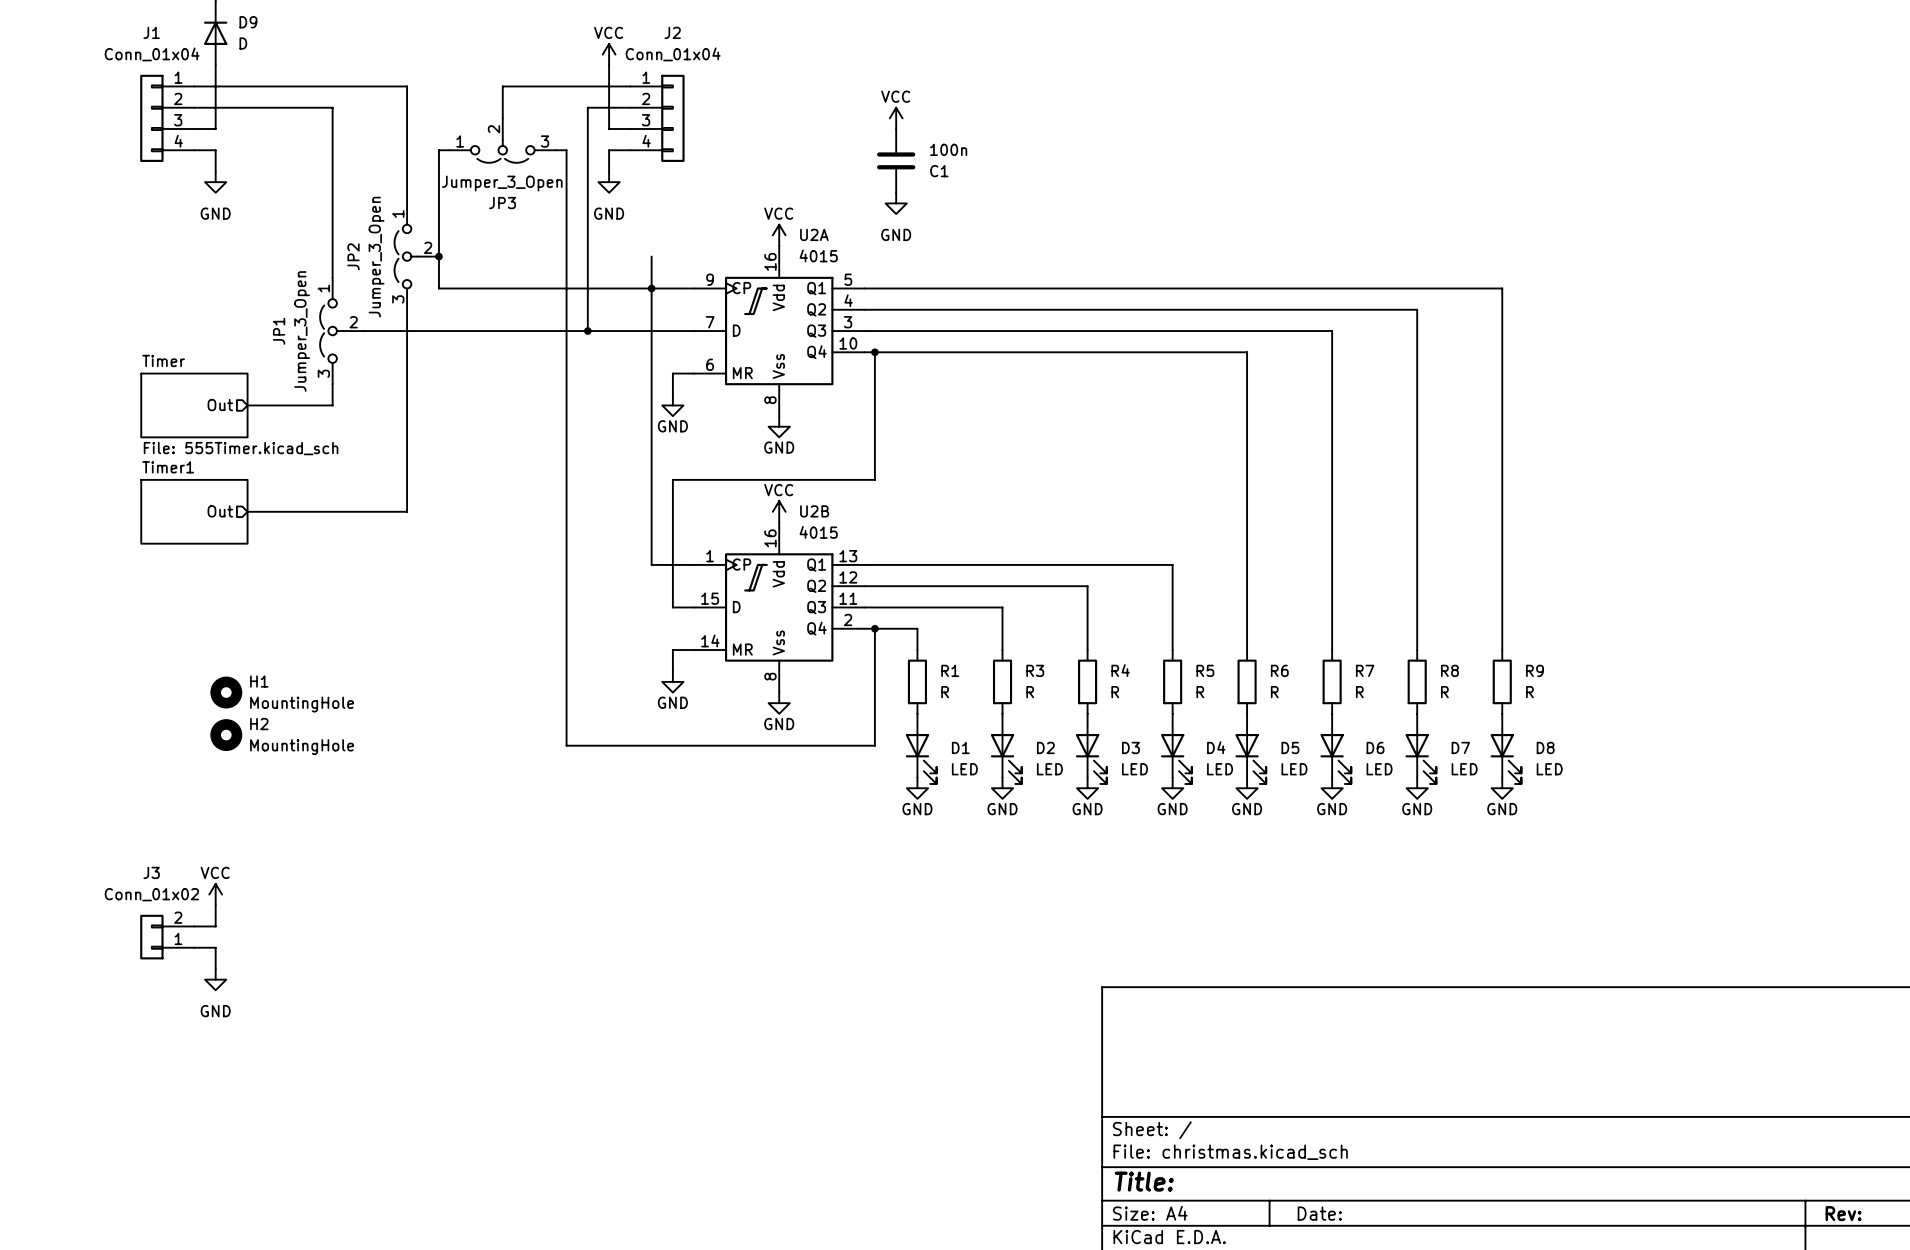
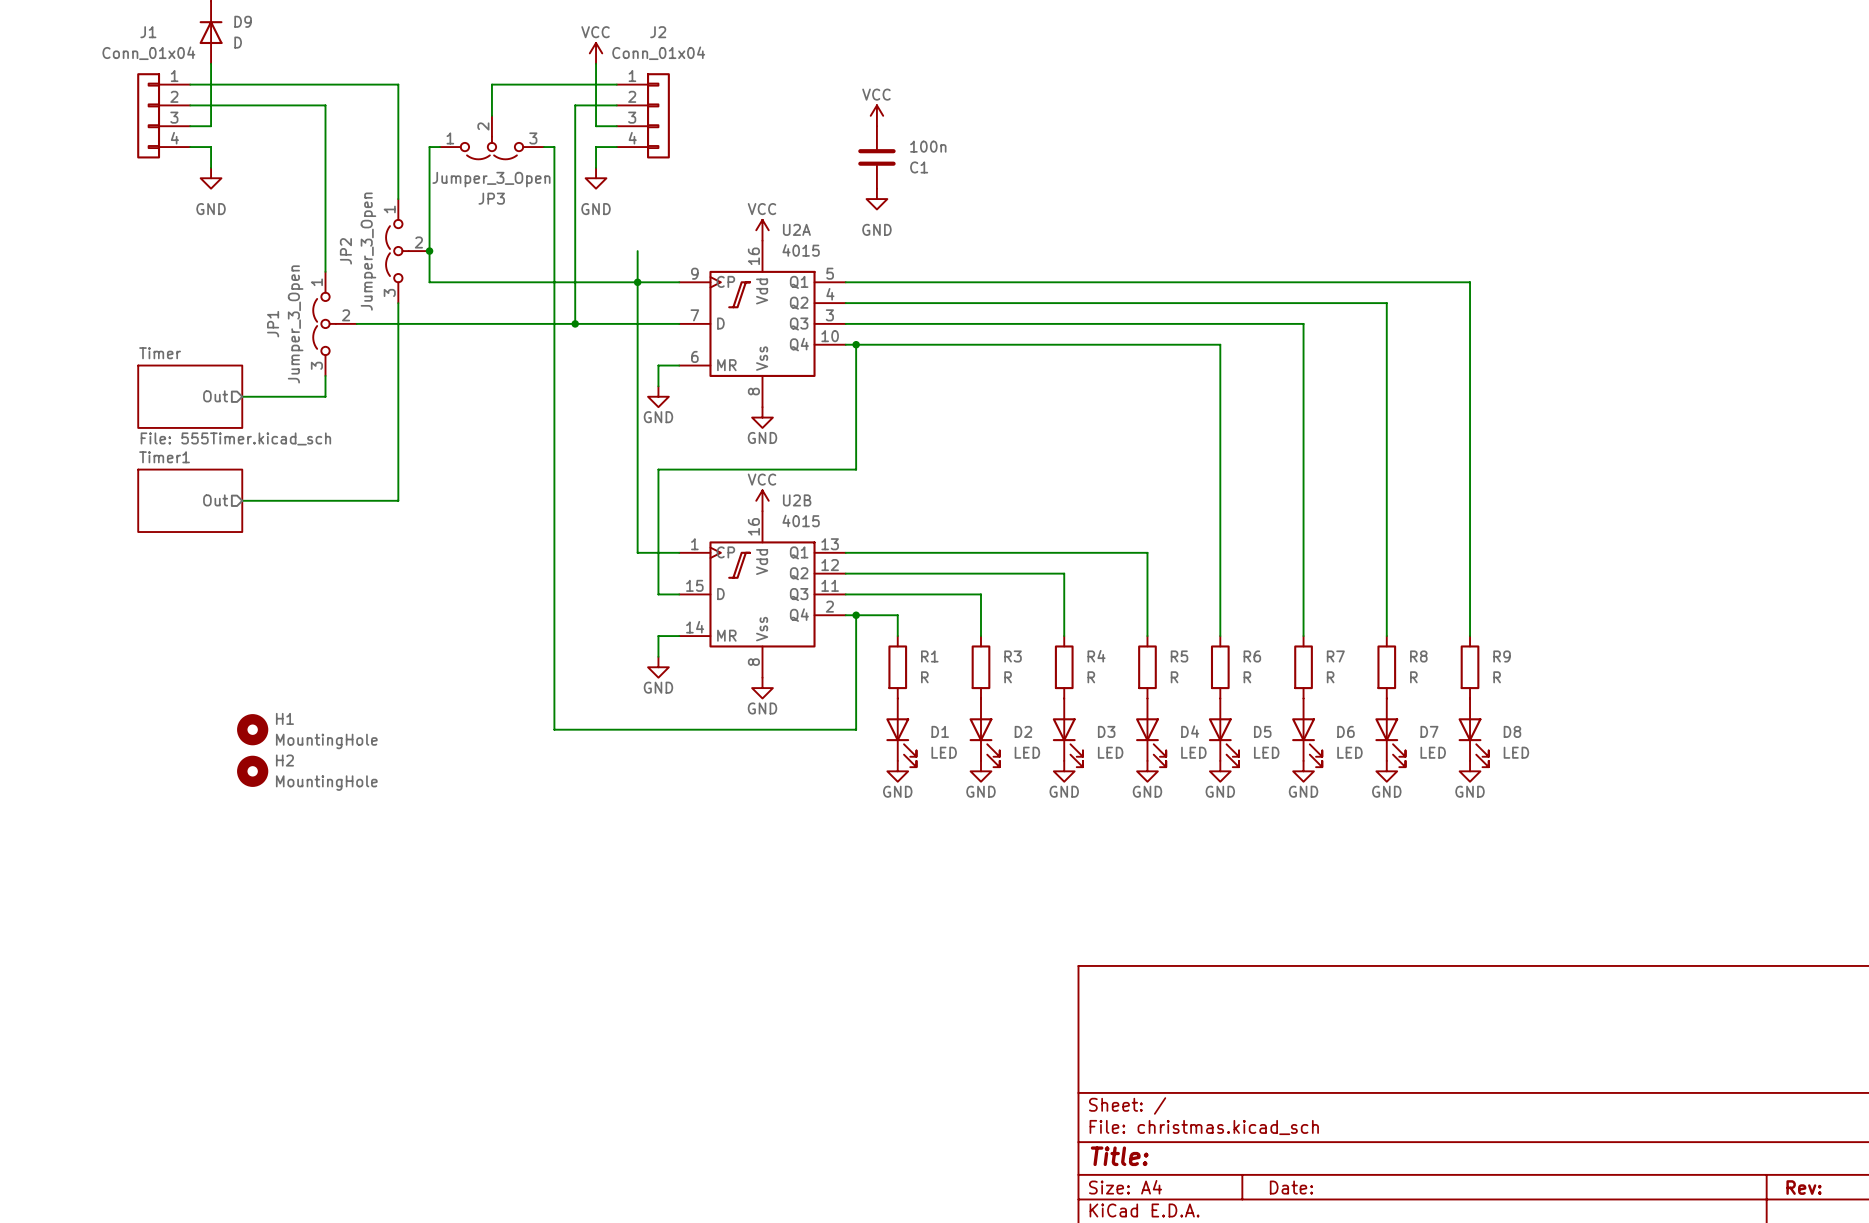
H1 position: (226, 692) -> (252, 729)
H2 position: (226, 735) -> (252, 771)
power symbol: VCC (215, 894) -> none
wire: (215, 905) (215, 926) (194, 926) -> none
J3: Conn_01x02 (167, 937) -> none
wire: (194, 947) (215, 947) (215, 969) -> none
power symbol: GND (215, 979) -> none

